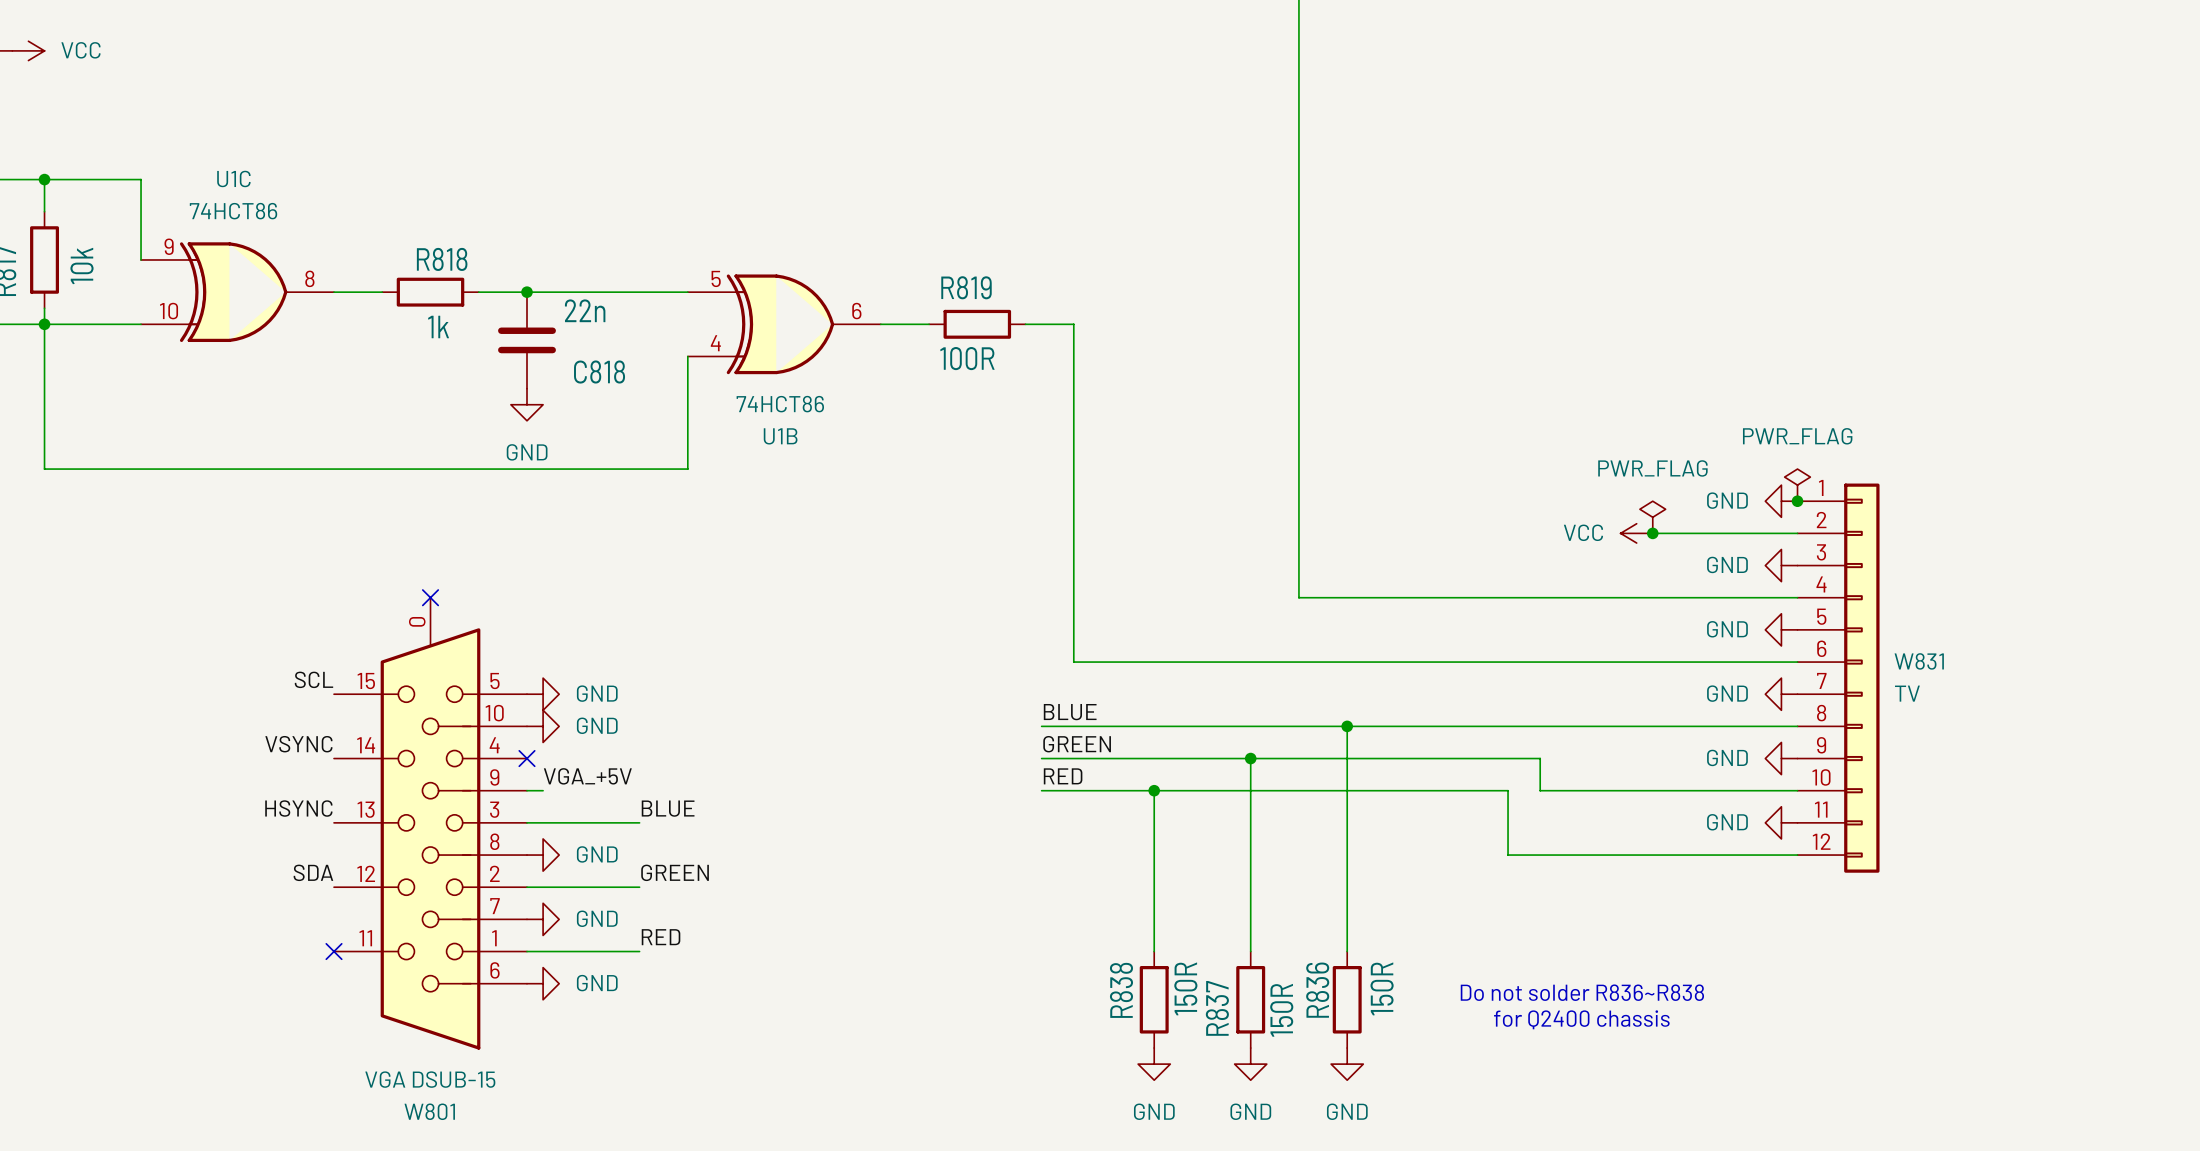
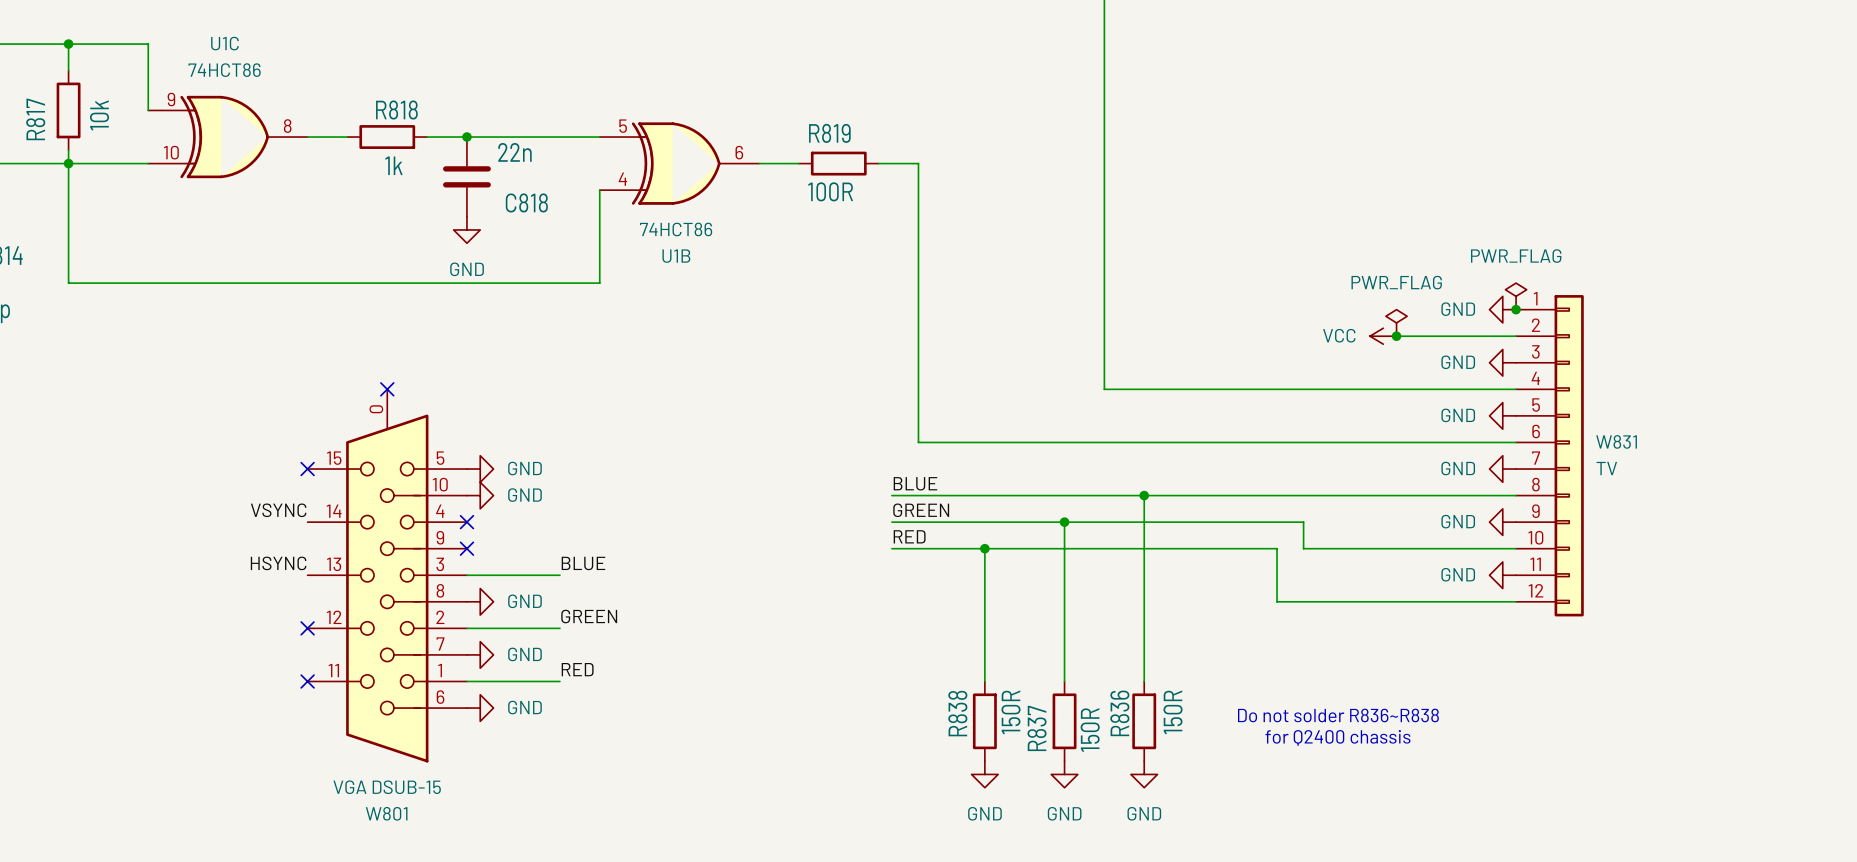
label: SCL (313, 679) -> none
no-connect mark: none -> (307, 469)
label: VGA_+5V (587, 776) -> none
wire: (527, 790) (543, 790) -> none
no-connect mark: none -> (466, 548)
label: SDA (313, 872) -> none
no-connect mark: none -> (307, 628)

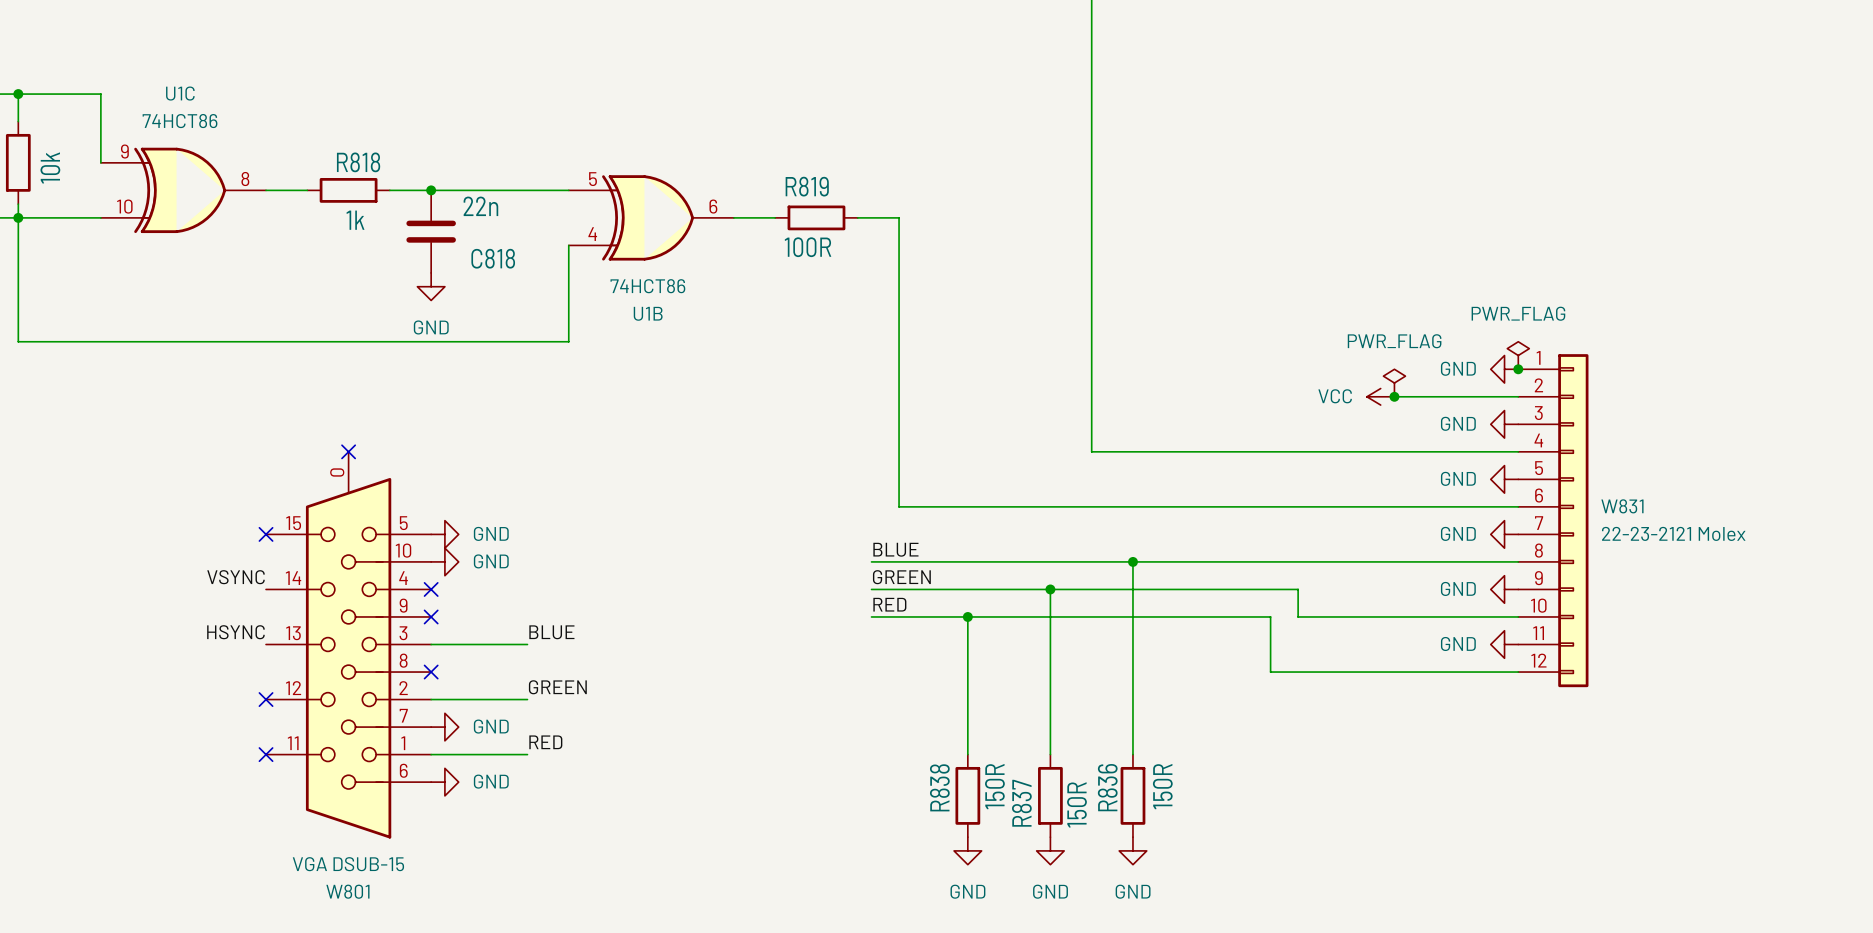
W831 value: TV (1606, 468) -> 22-23-2121 Molex (1673, 533)
no-connect mark: none -> (431, 672)
power symbol: GND (480, 601) -> none
text: Do not solder R836~R838 (1338, 715) -> none
text: for Q2400 chassis (1337, 737) -> none

